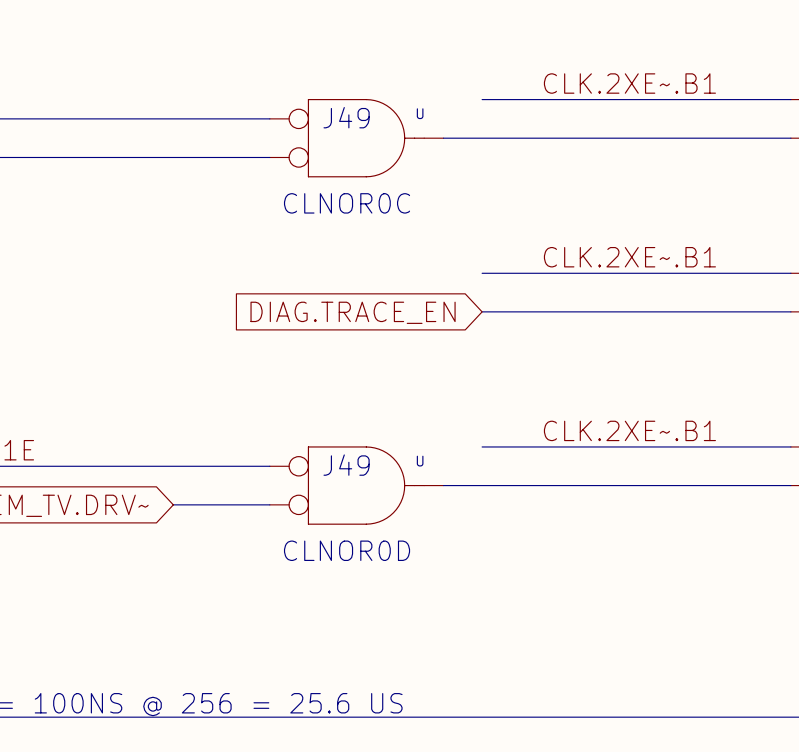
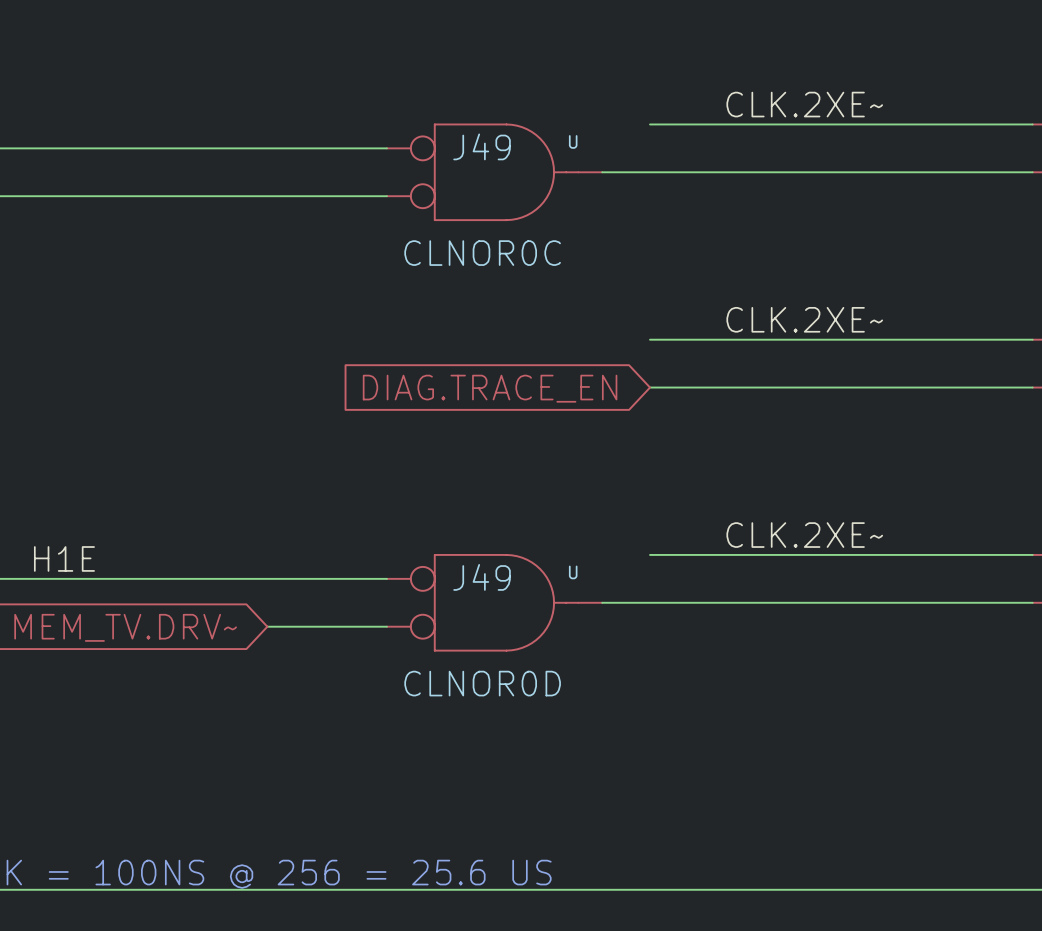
label: CLK.2XE~.B1 (629, 83) -> CLK.2XE~ (804, 104)
label: CLK.2XE~.B1 (629, 257) -> CLK.2XE~ (804, 319)
label: CLK.2XE~.B1 (629, 430) -> CLK.2XE~ (804, 535)

